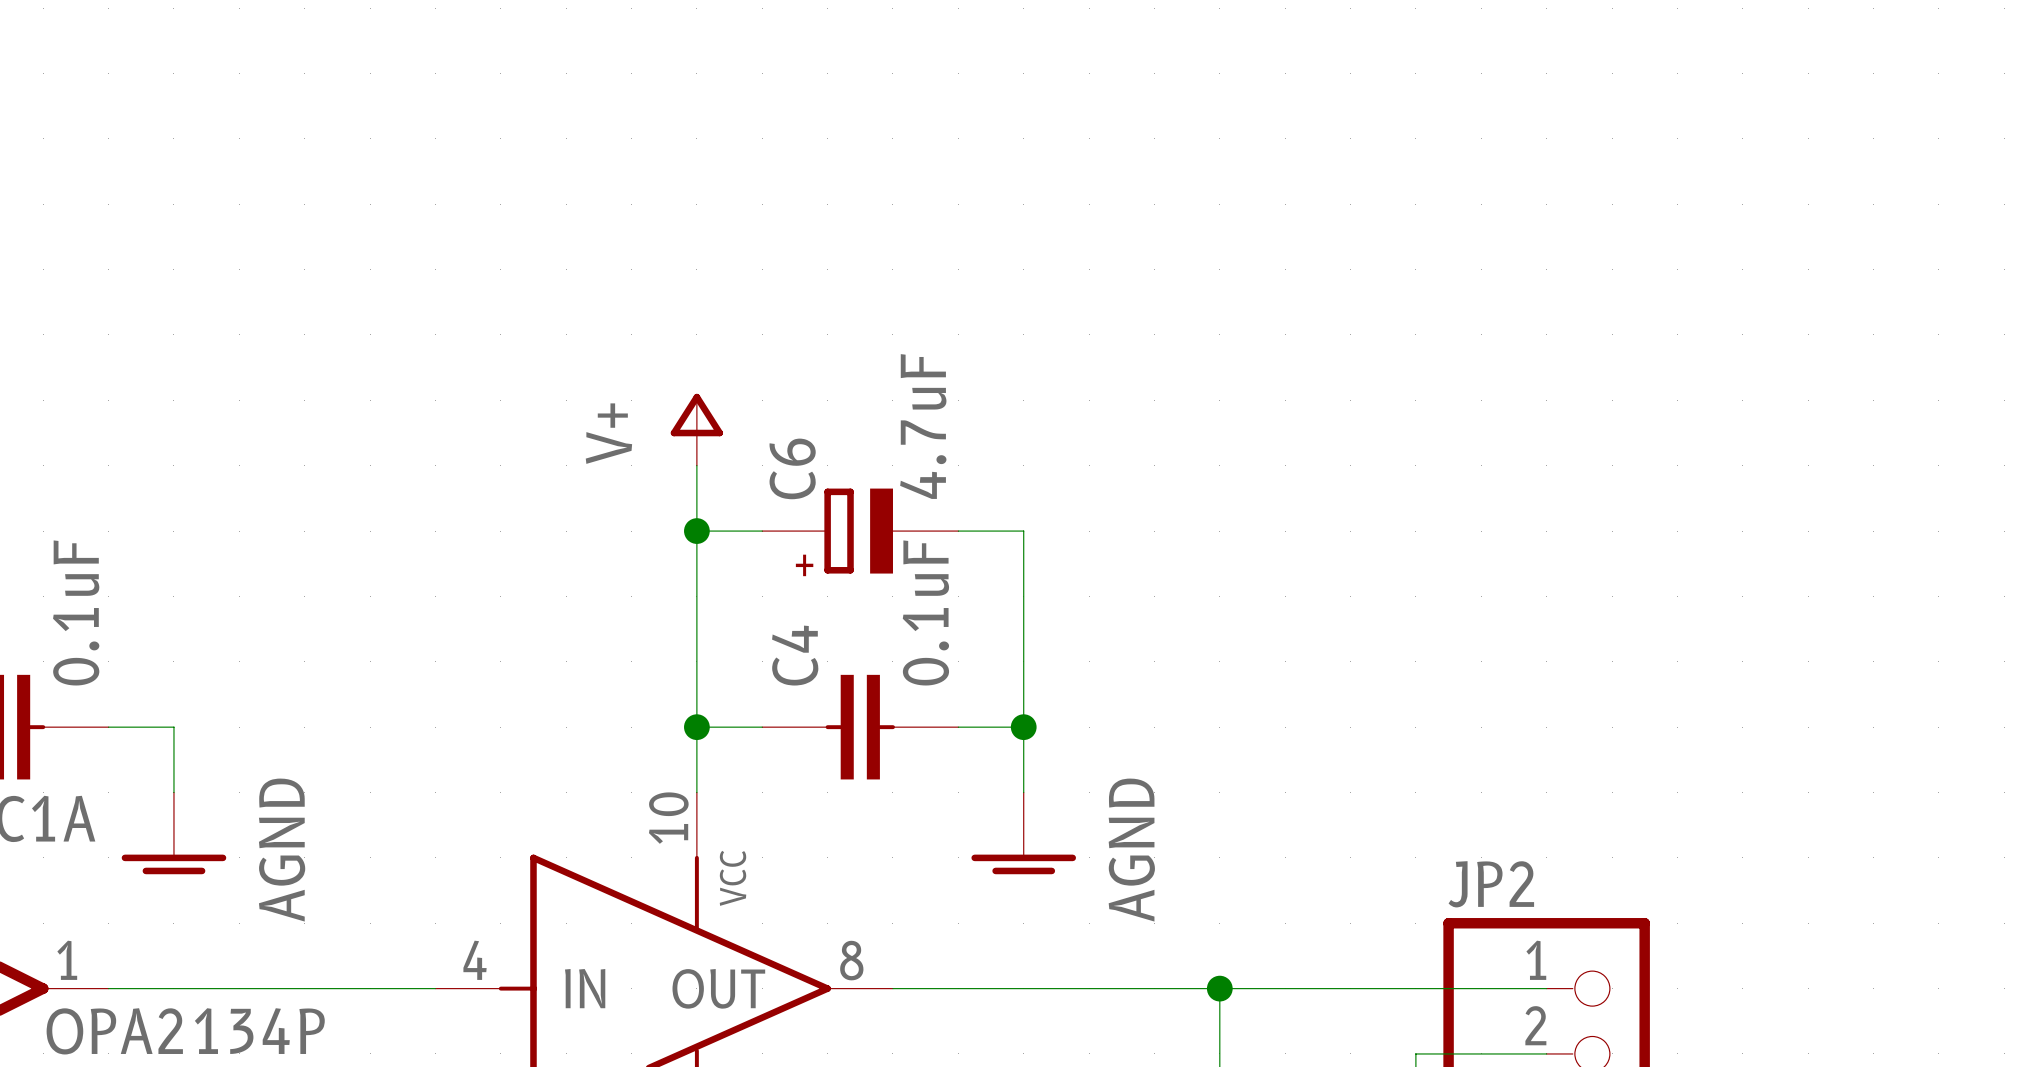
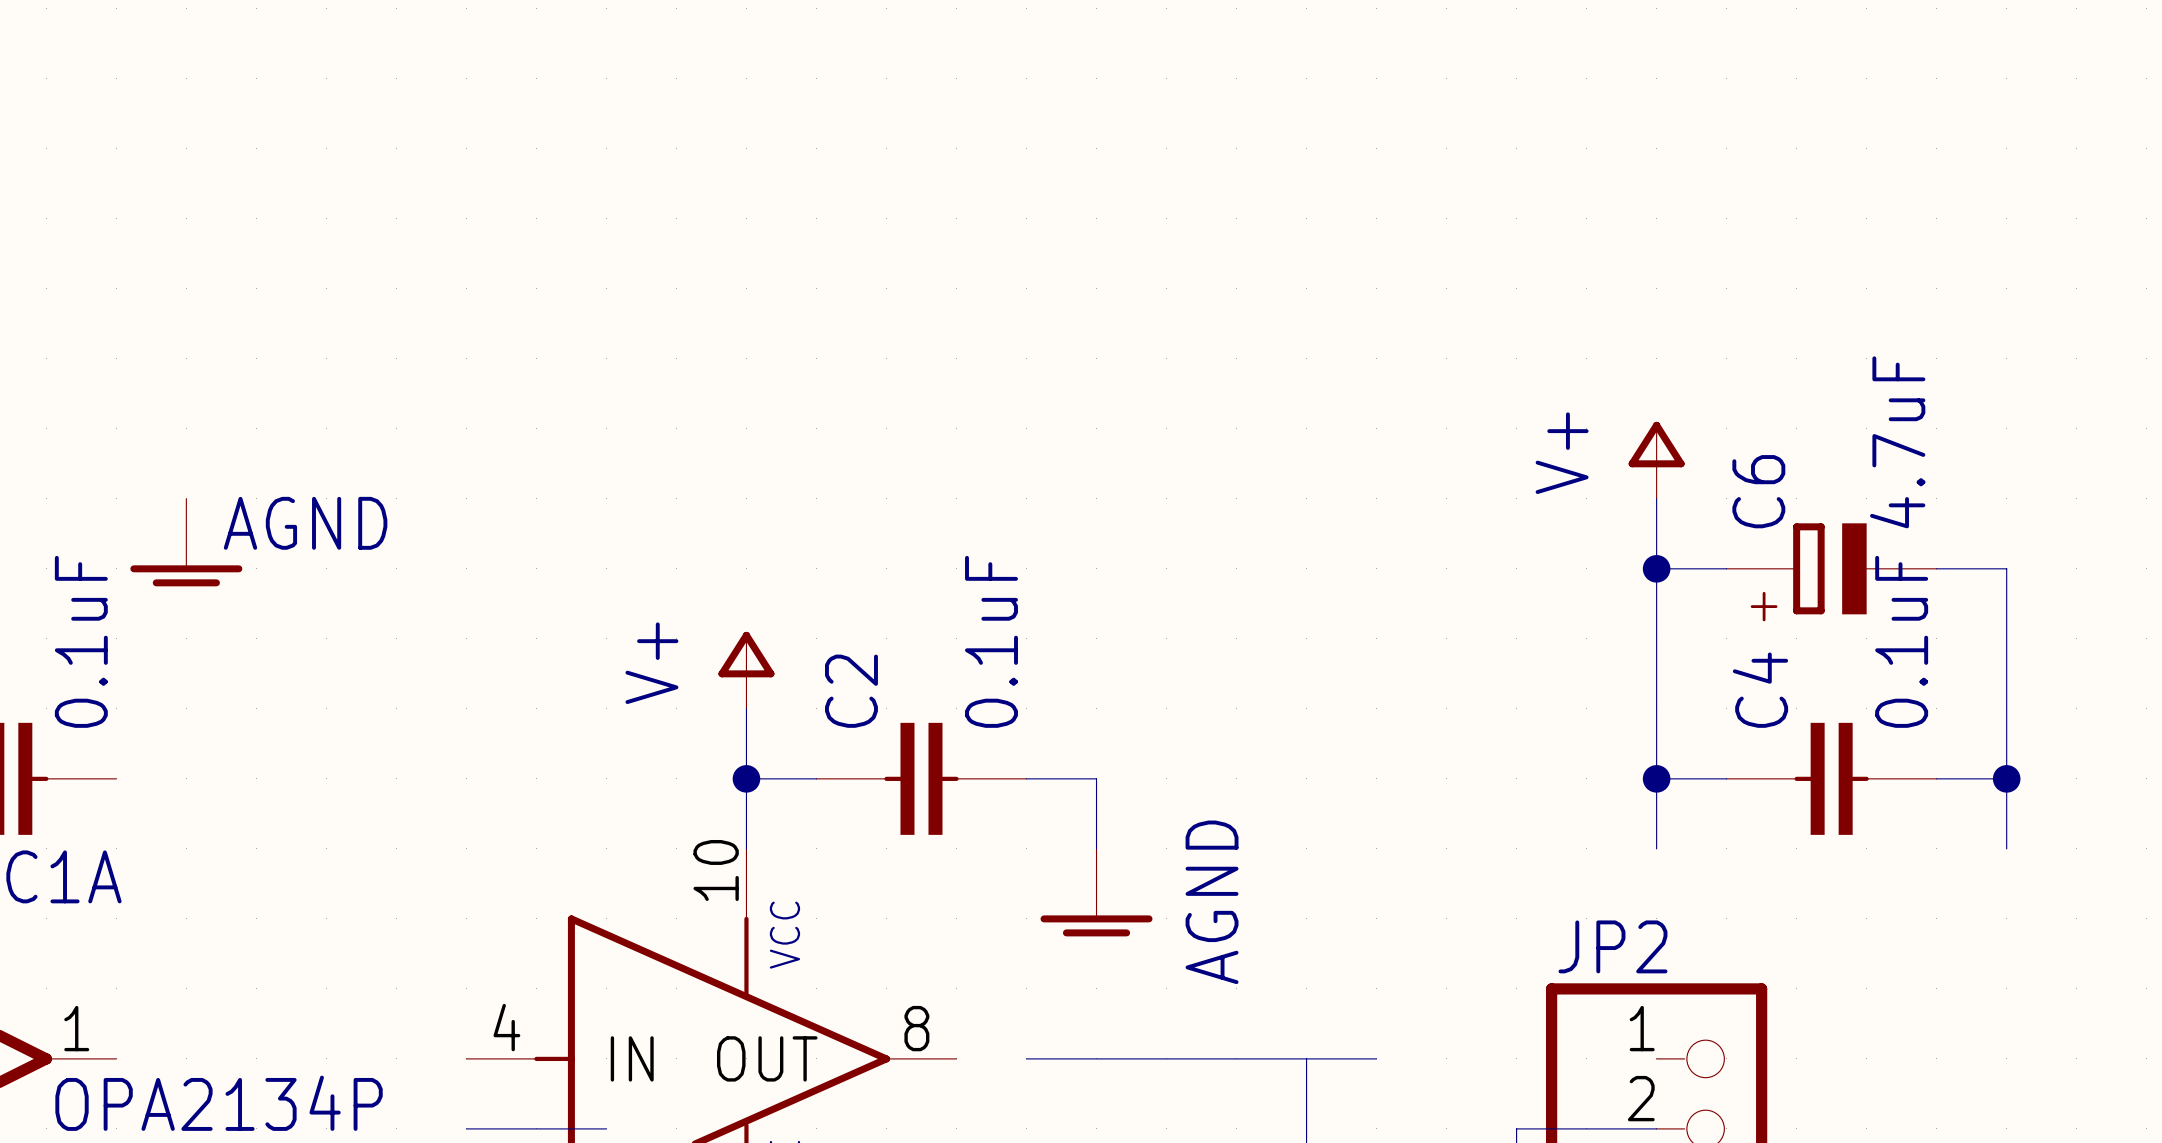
power symbol position: V+ (696, 429) -> V+ (746, 670)
power symbol: none -> V+ (1656, 460)
wire: (696, 465) (696, 661) -> none
wire: none -> (1656, 498) (1656, 848)
power symbol: none -> AGND (186, 542)
wire: (696, 531) (762, 531) -> none
junction: (696, 531) -> none
C6 position: (860, 531) -> (1831, 568)
wire: (958, 531) (1023, 531) (1023, 727) -> none
wire: none -> (1656, 568) (1726, 568)
junction: none -> (1656, 568)
wire: none -> (1936, 568) (2006, 568) (2006, 848)
C4 name: C4 (795, 655) -> C2 (851, 691)
wire: (108, 727) (173, 727) (173, 792) -> none
junction: (1023, 727) -> none
wire: none -> (1656, 778) (1726, 778)
junction: none -> (1656, 778)
C4: none -> 0.1uF (1831, 778)
wire: none -> (1936, 778) (2006, 778)
junction: none -> (2006, 778)
power symbol: AGND (173, 833) -> none
wire: (108, 988) (435, 988) -> none
wire: (892, 988) (958, 988) -> none
junction: (1219, 988) -> none
wire: (1285, 988) (1546, 988) -> none
wire: none -> (466, 1128) (606, 1128)

